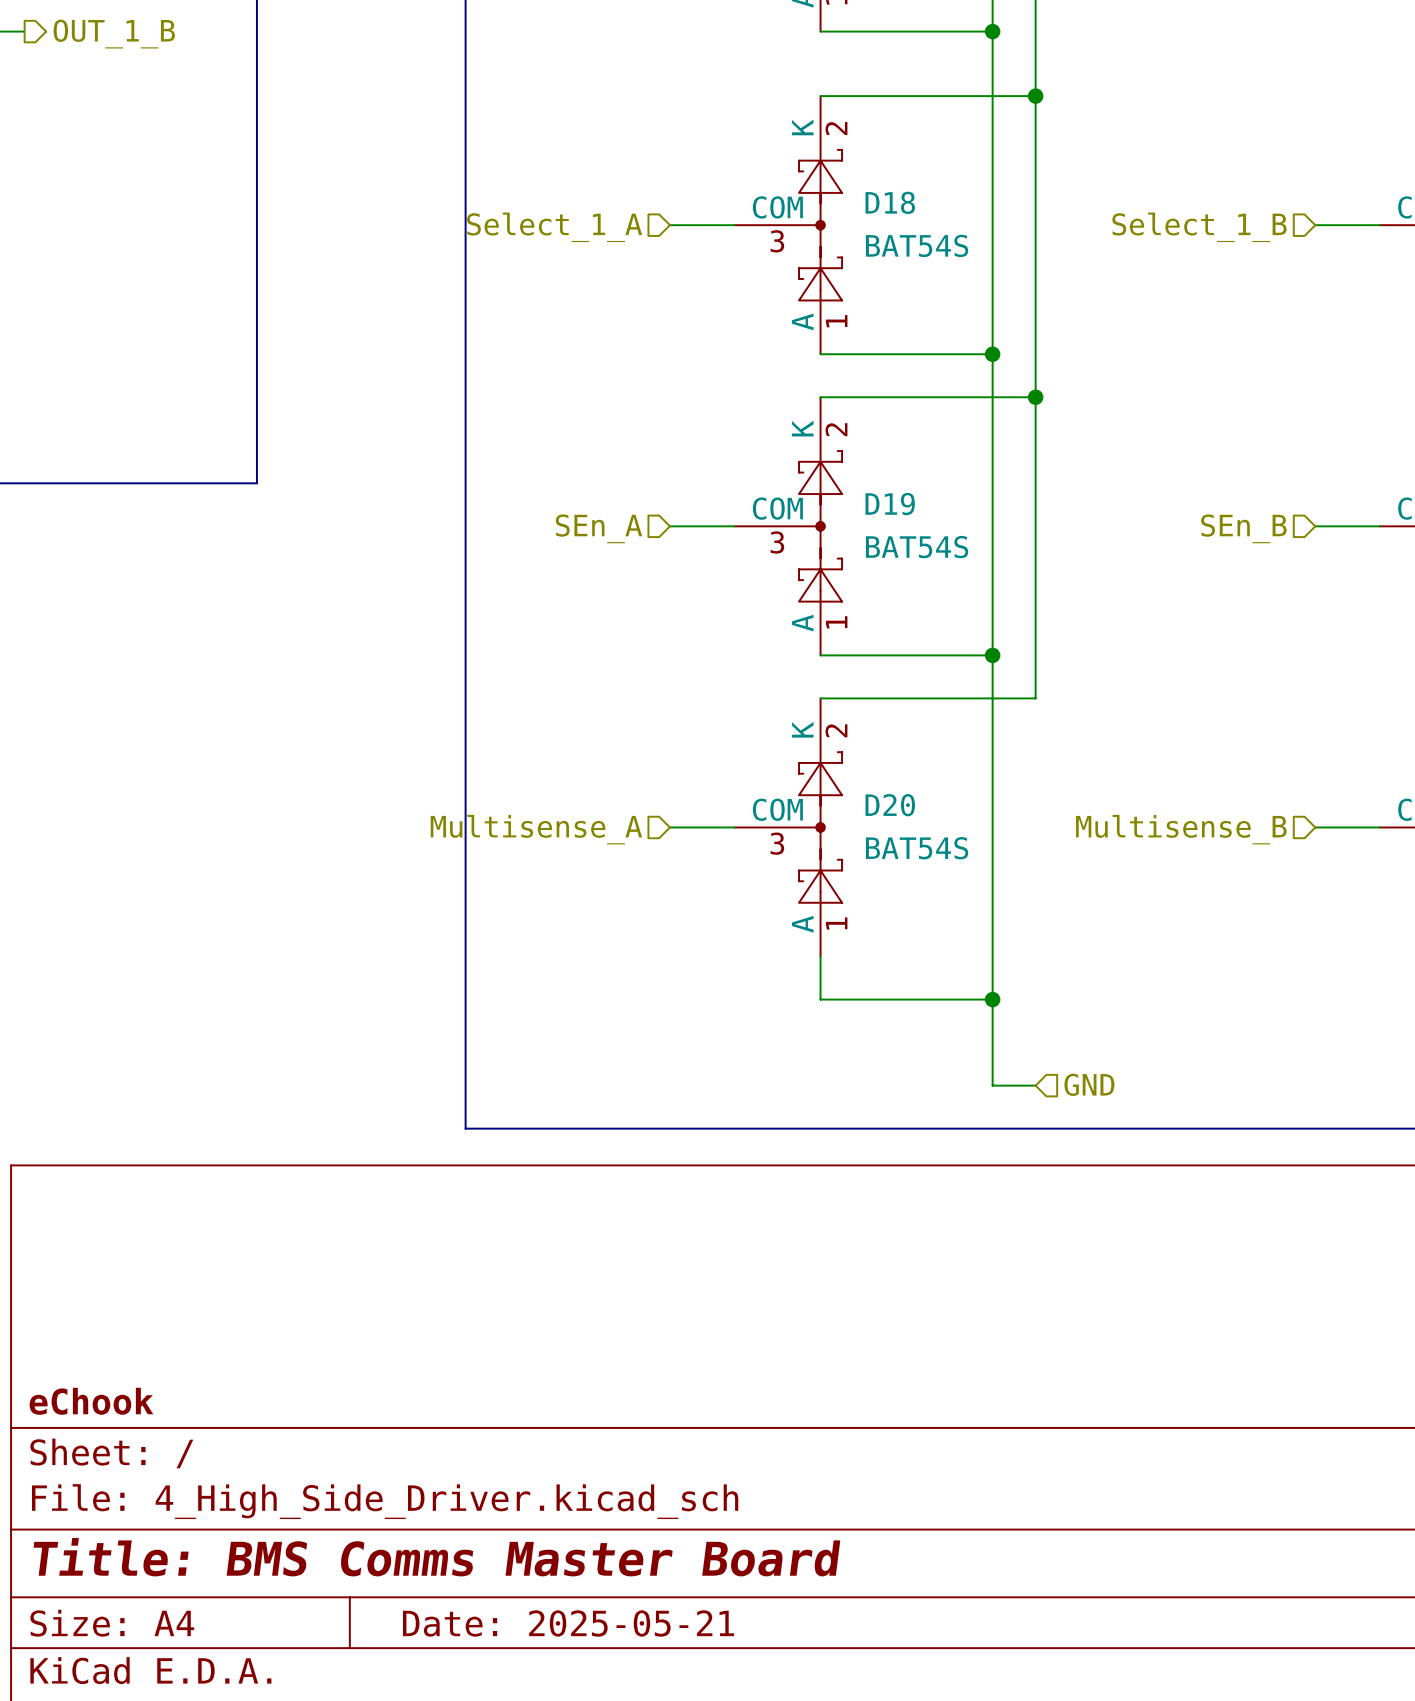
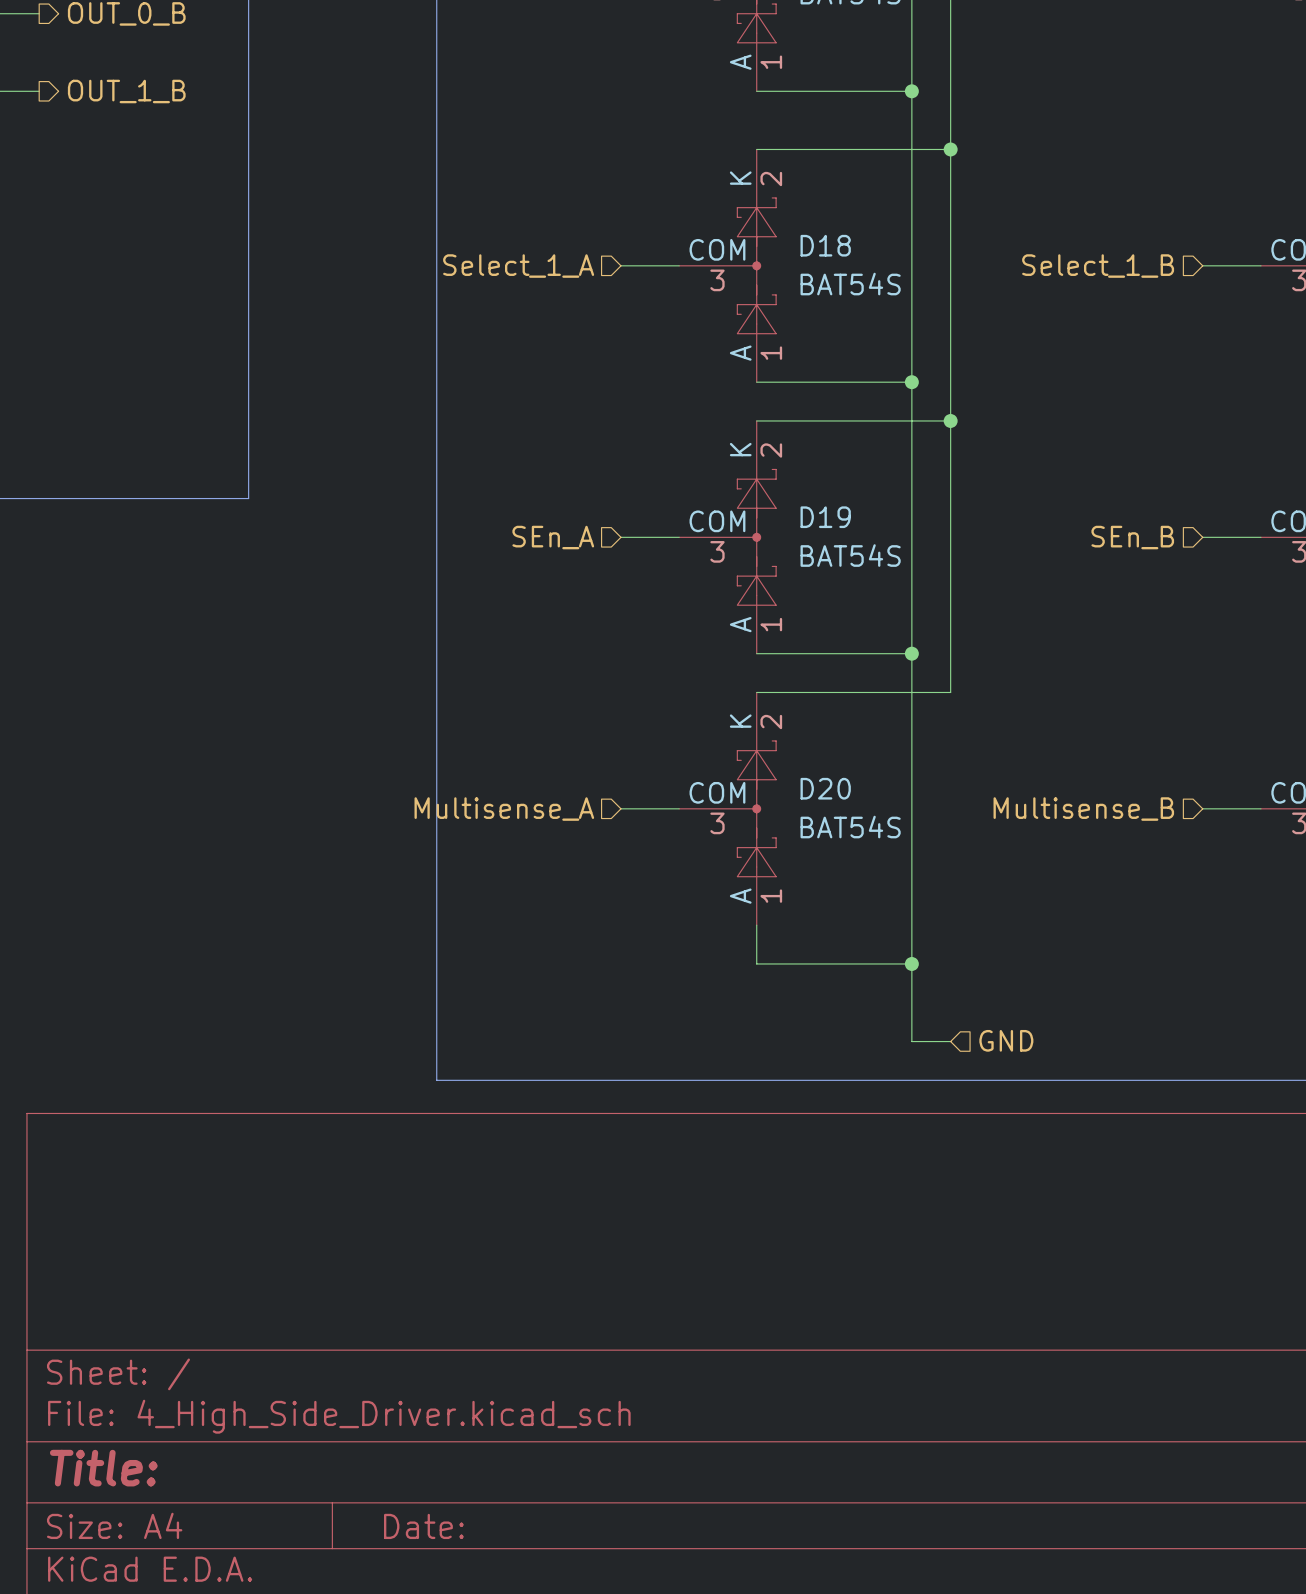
title block: eChook (91, 1401) -> none
title block: Title: BMS Comms Master Board (436, 1557) -> Title: (103, 1468)
title block: Date: 2025-05-21 (568, 1623) -> Date: (423, 1526)

